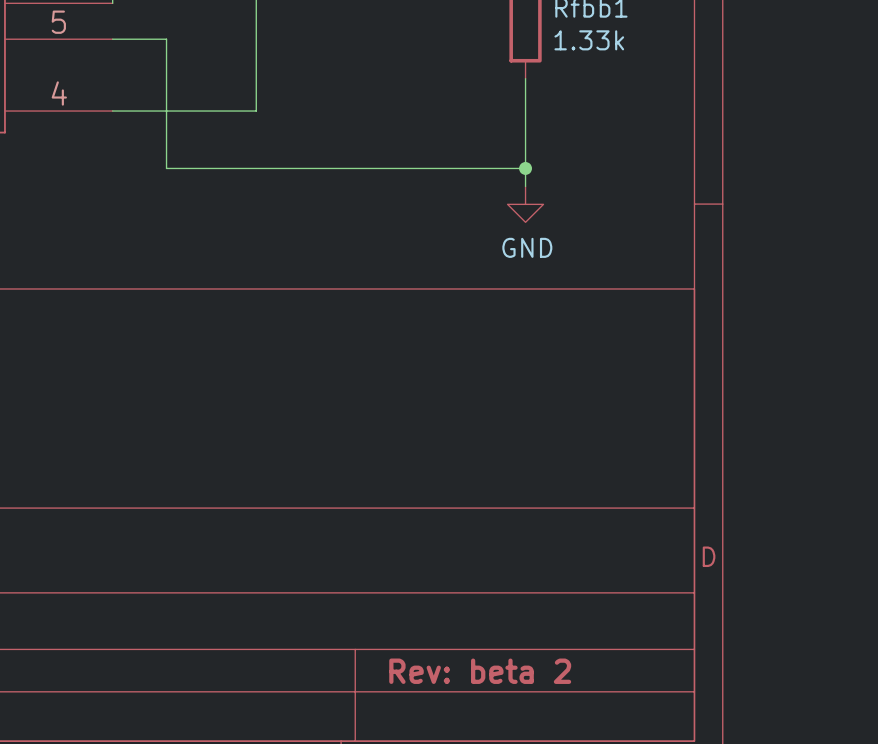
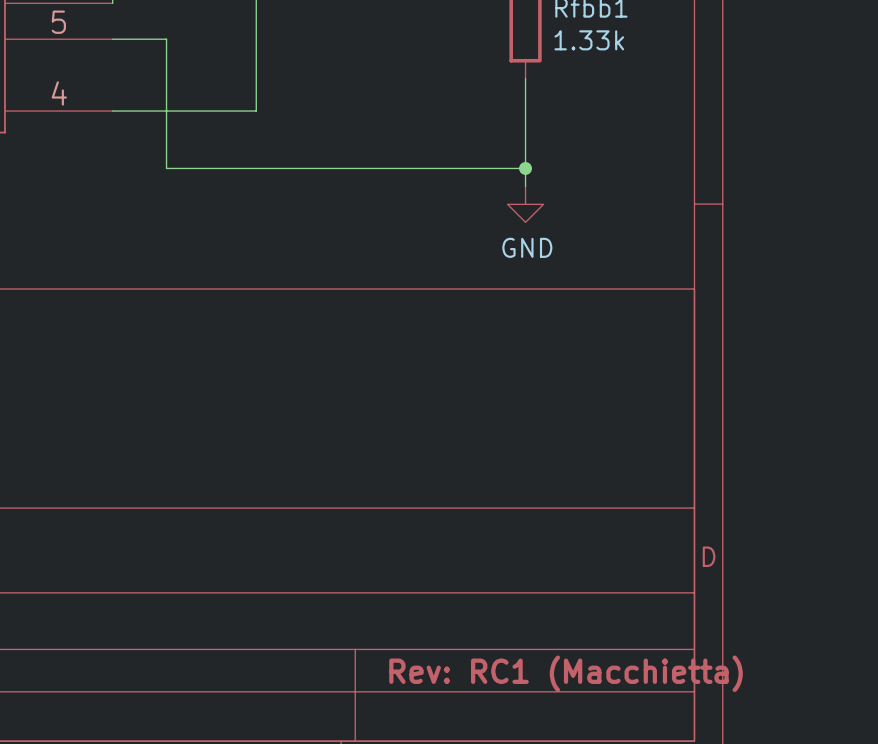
title block: Rev: beta 2 (480, 671) -> Rev: RC1 (Macchietta) (566, 673)

